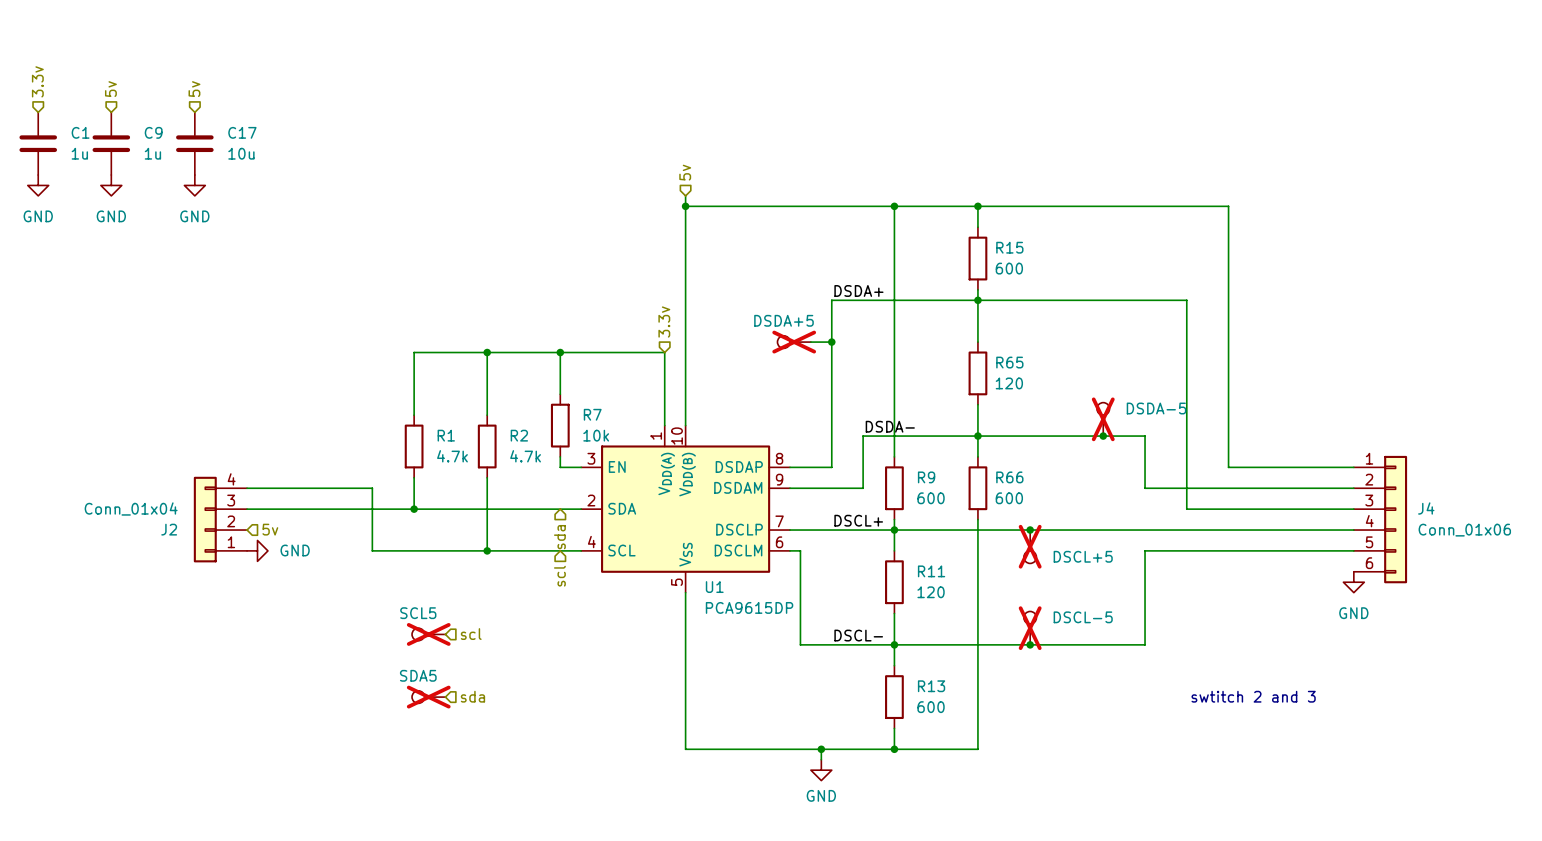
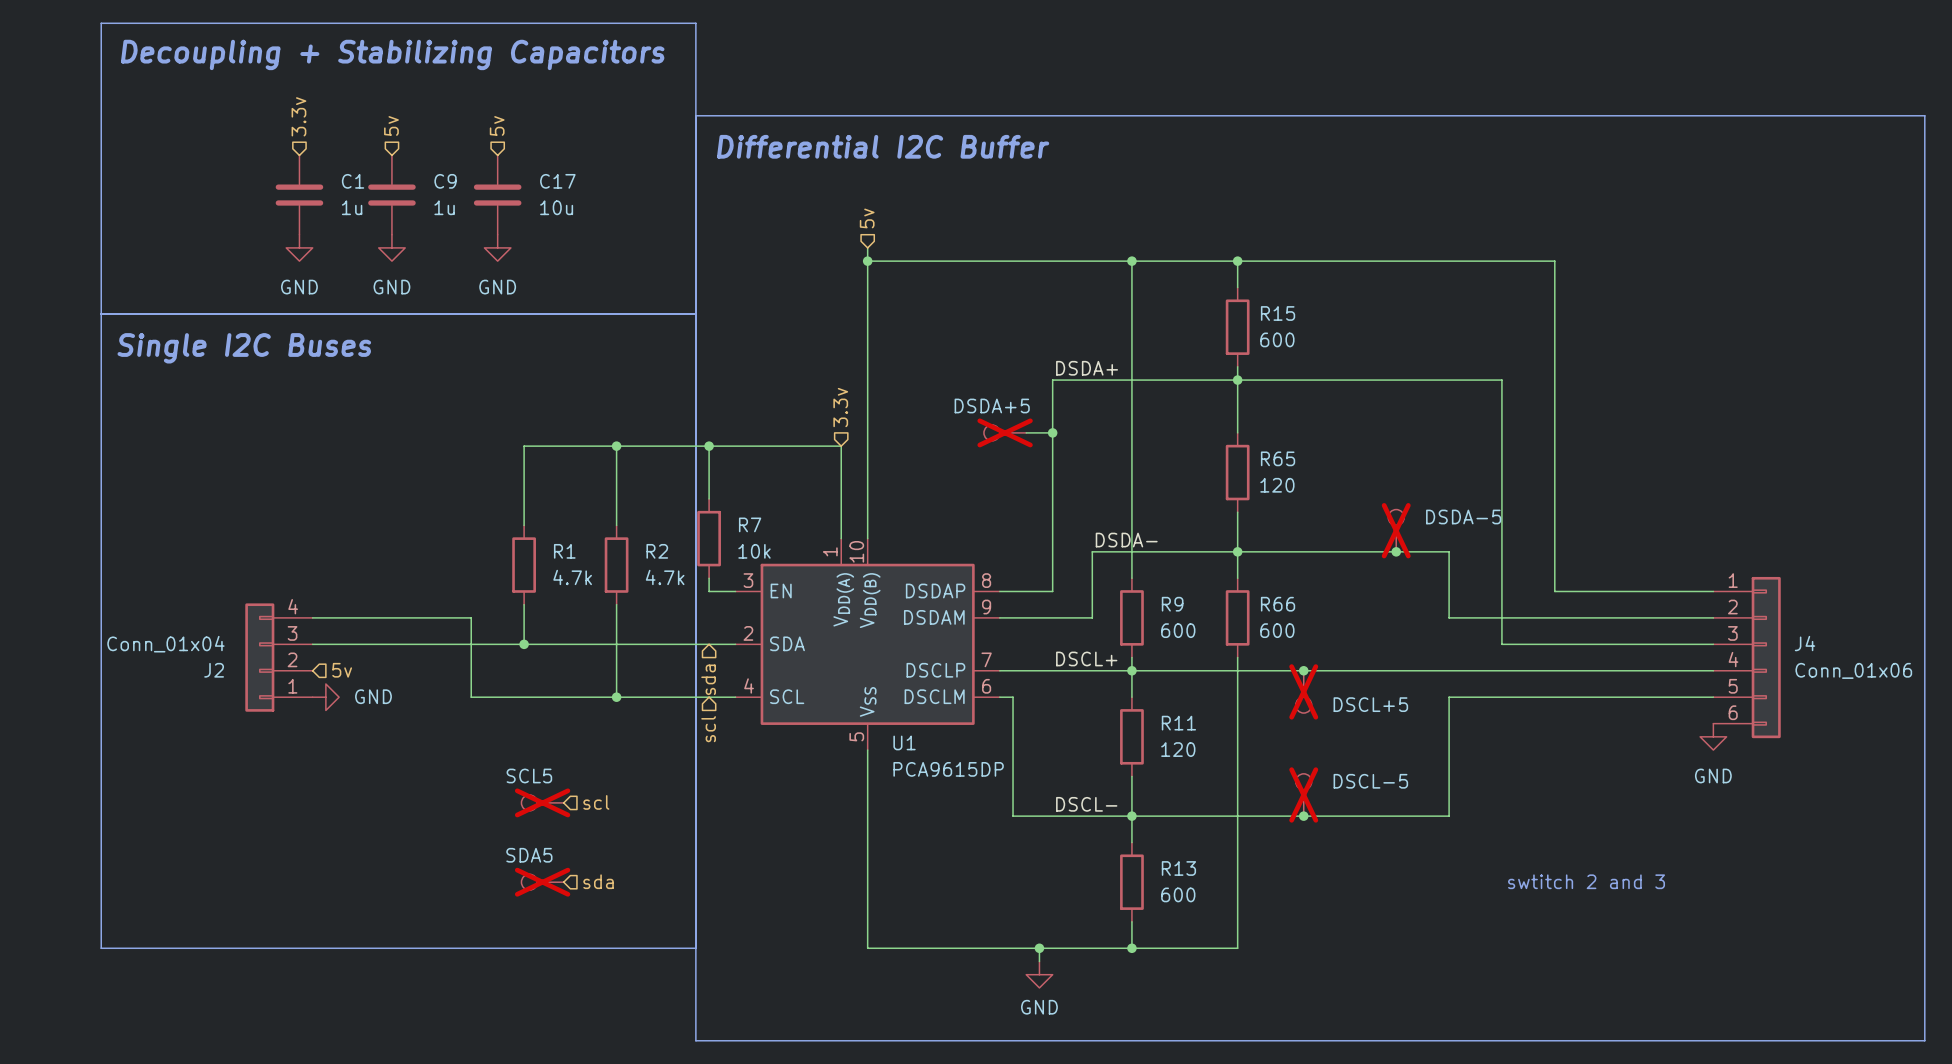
text: none -> Decoupling + Stabilizing Capacitors (392, 54)
hierarchical label position: 3.3v (37, 81) -> 3.3v (298, 116)
hierarchical label: 5v (110, 89) -> none
hierarchical label: 5v (194, 89) -> none
line: none -> (695, 115) (1924, 115) (1924, 1040) (695, 1040) (695, 23) (101, 23) (101, 948) (695, 948)
hierarchical label: none -> 5v (391, 125)
hierarchical label: none -> 5v (497, 125)
text: none -> Differential I2C Buffer (883, 146)
C1 position: (38, 143) -> (299, 195)
C9 position: (111, 143) -> (391, 195)
C17 position: (194, 143) -> (497, 195)
power symbol: GND (38, 185) -> none
power symbol: GND (111, 185) -> none
power symbol position: GND (194, 185) -> GND (299, 247)
power symbol: none -> GND (391, 247)
power symbol: none -> GND (497, 247)
line: none -> (101, 313) (695, 313)
text: none -> Single I2C Buses (244, 348)

